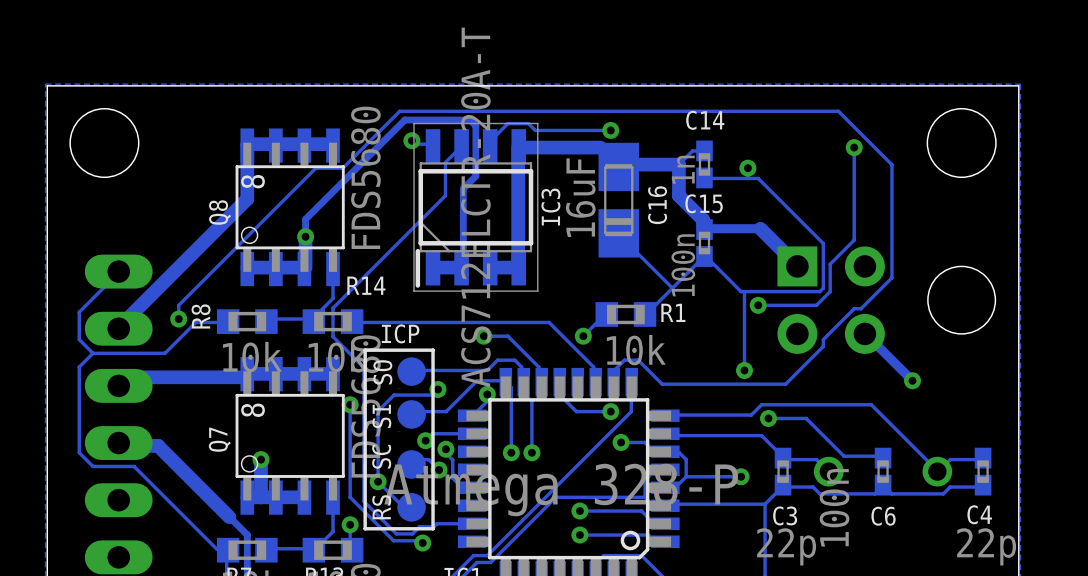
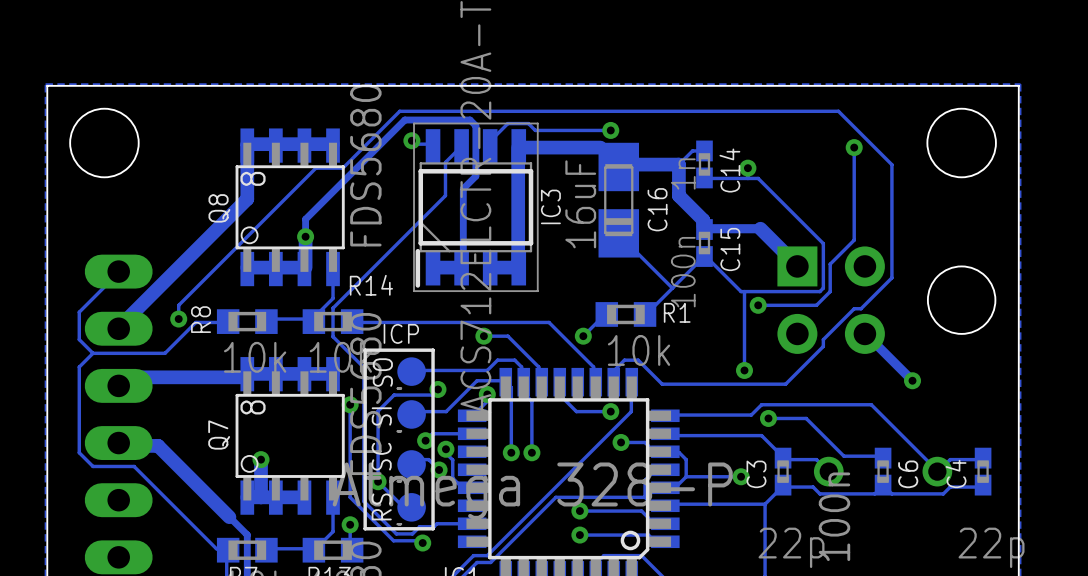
C14 name rotation: 0° (705, 120) -> 90° counterclockwise (729, 170)
C15 name rotation: 0° (704, 203) -> 90° counterclockwise (730, 249)
C4 name rotation: 0° (979, 514) -> 90° counterclockwise (956, 473)
C3 name rotation: 0° (785, 515) -> 90° counterclockwise (756, 474)
C3 name position: C3 (785, 515) -> C3 (756, 474)
C6 name rotation: 0° (883, 516) -> 90° counterclockwise (908, 474)
C6 name position: C6 (883, 516) -> C6 (908, 474)

